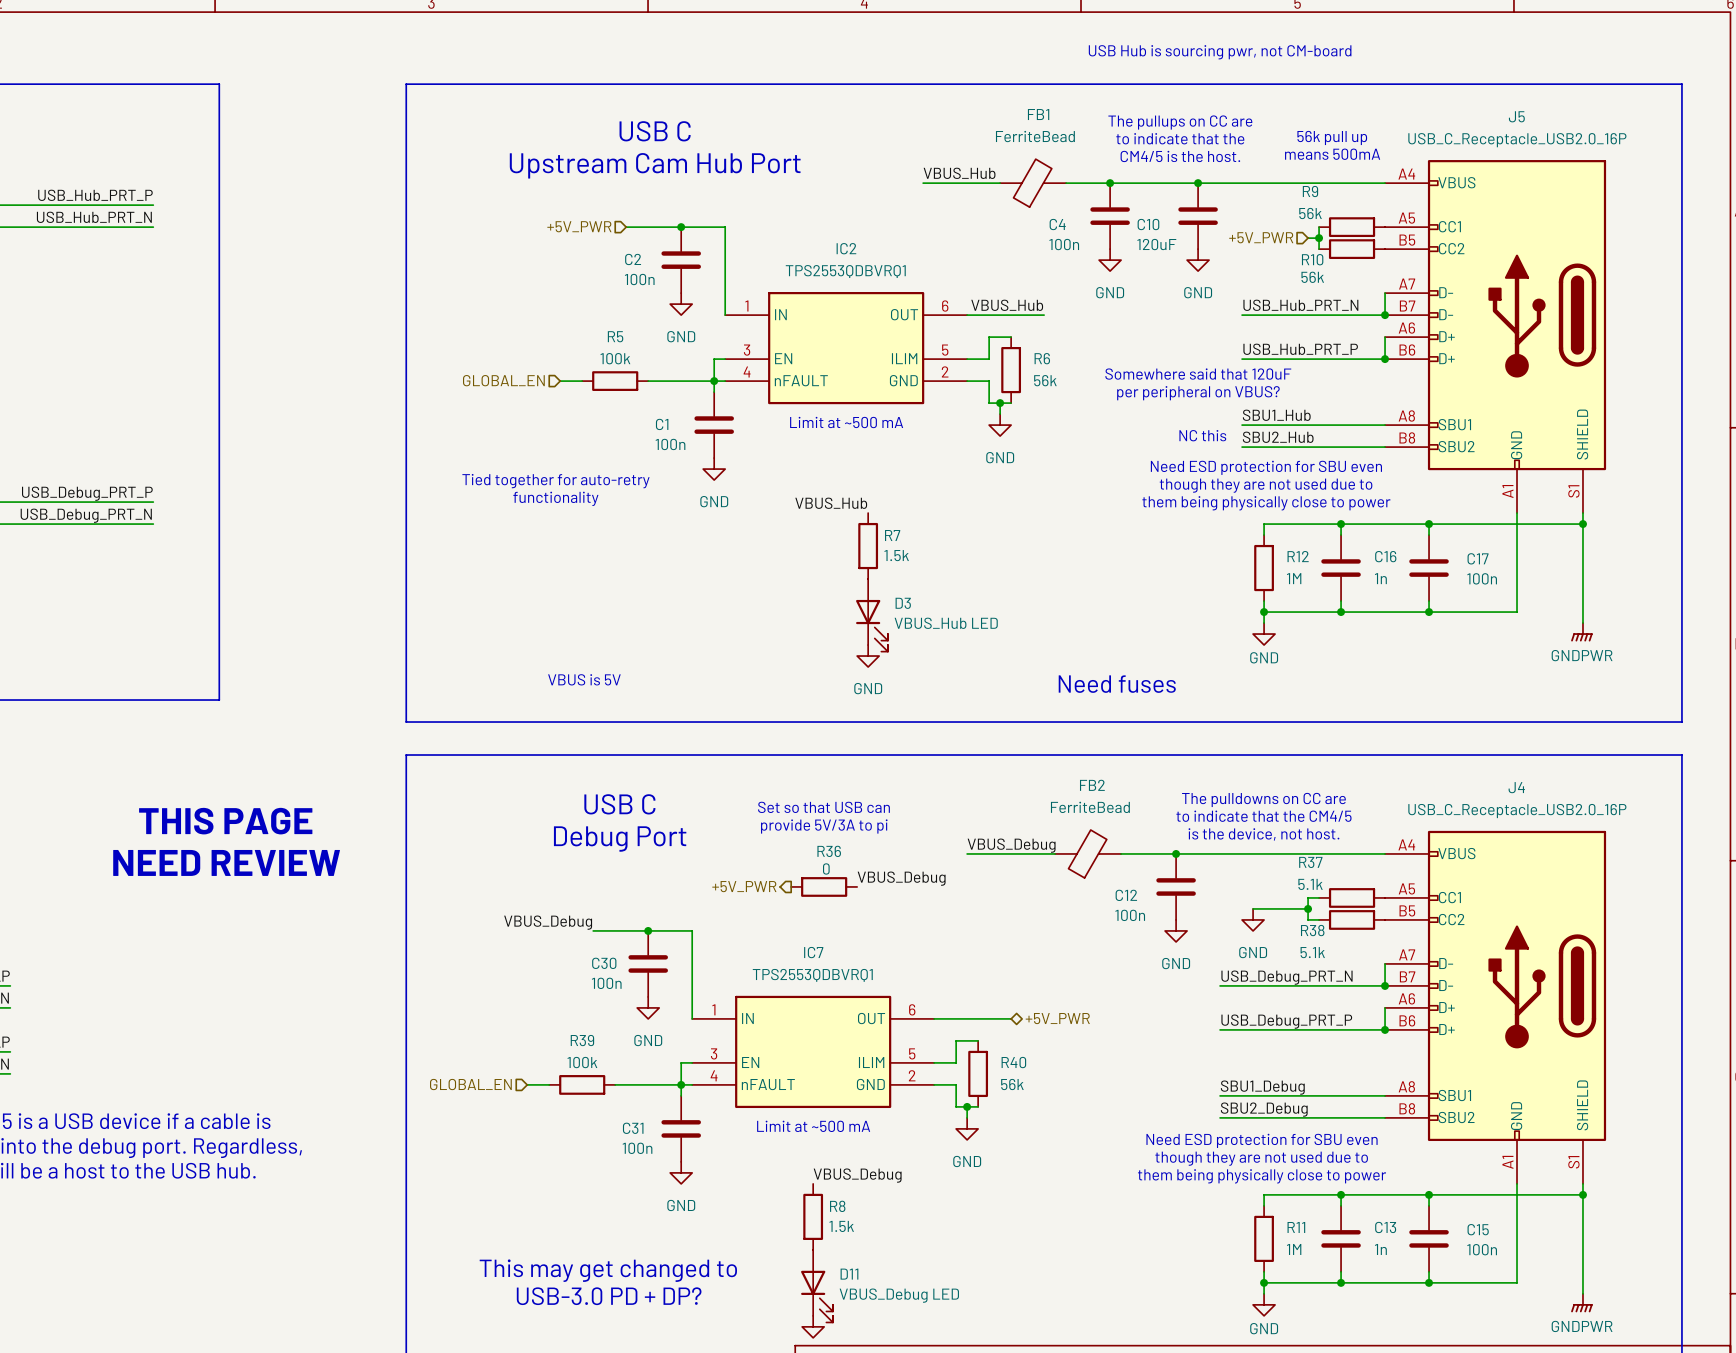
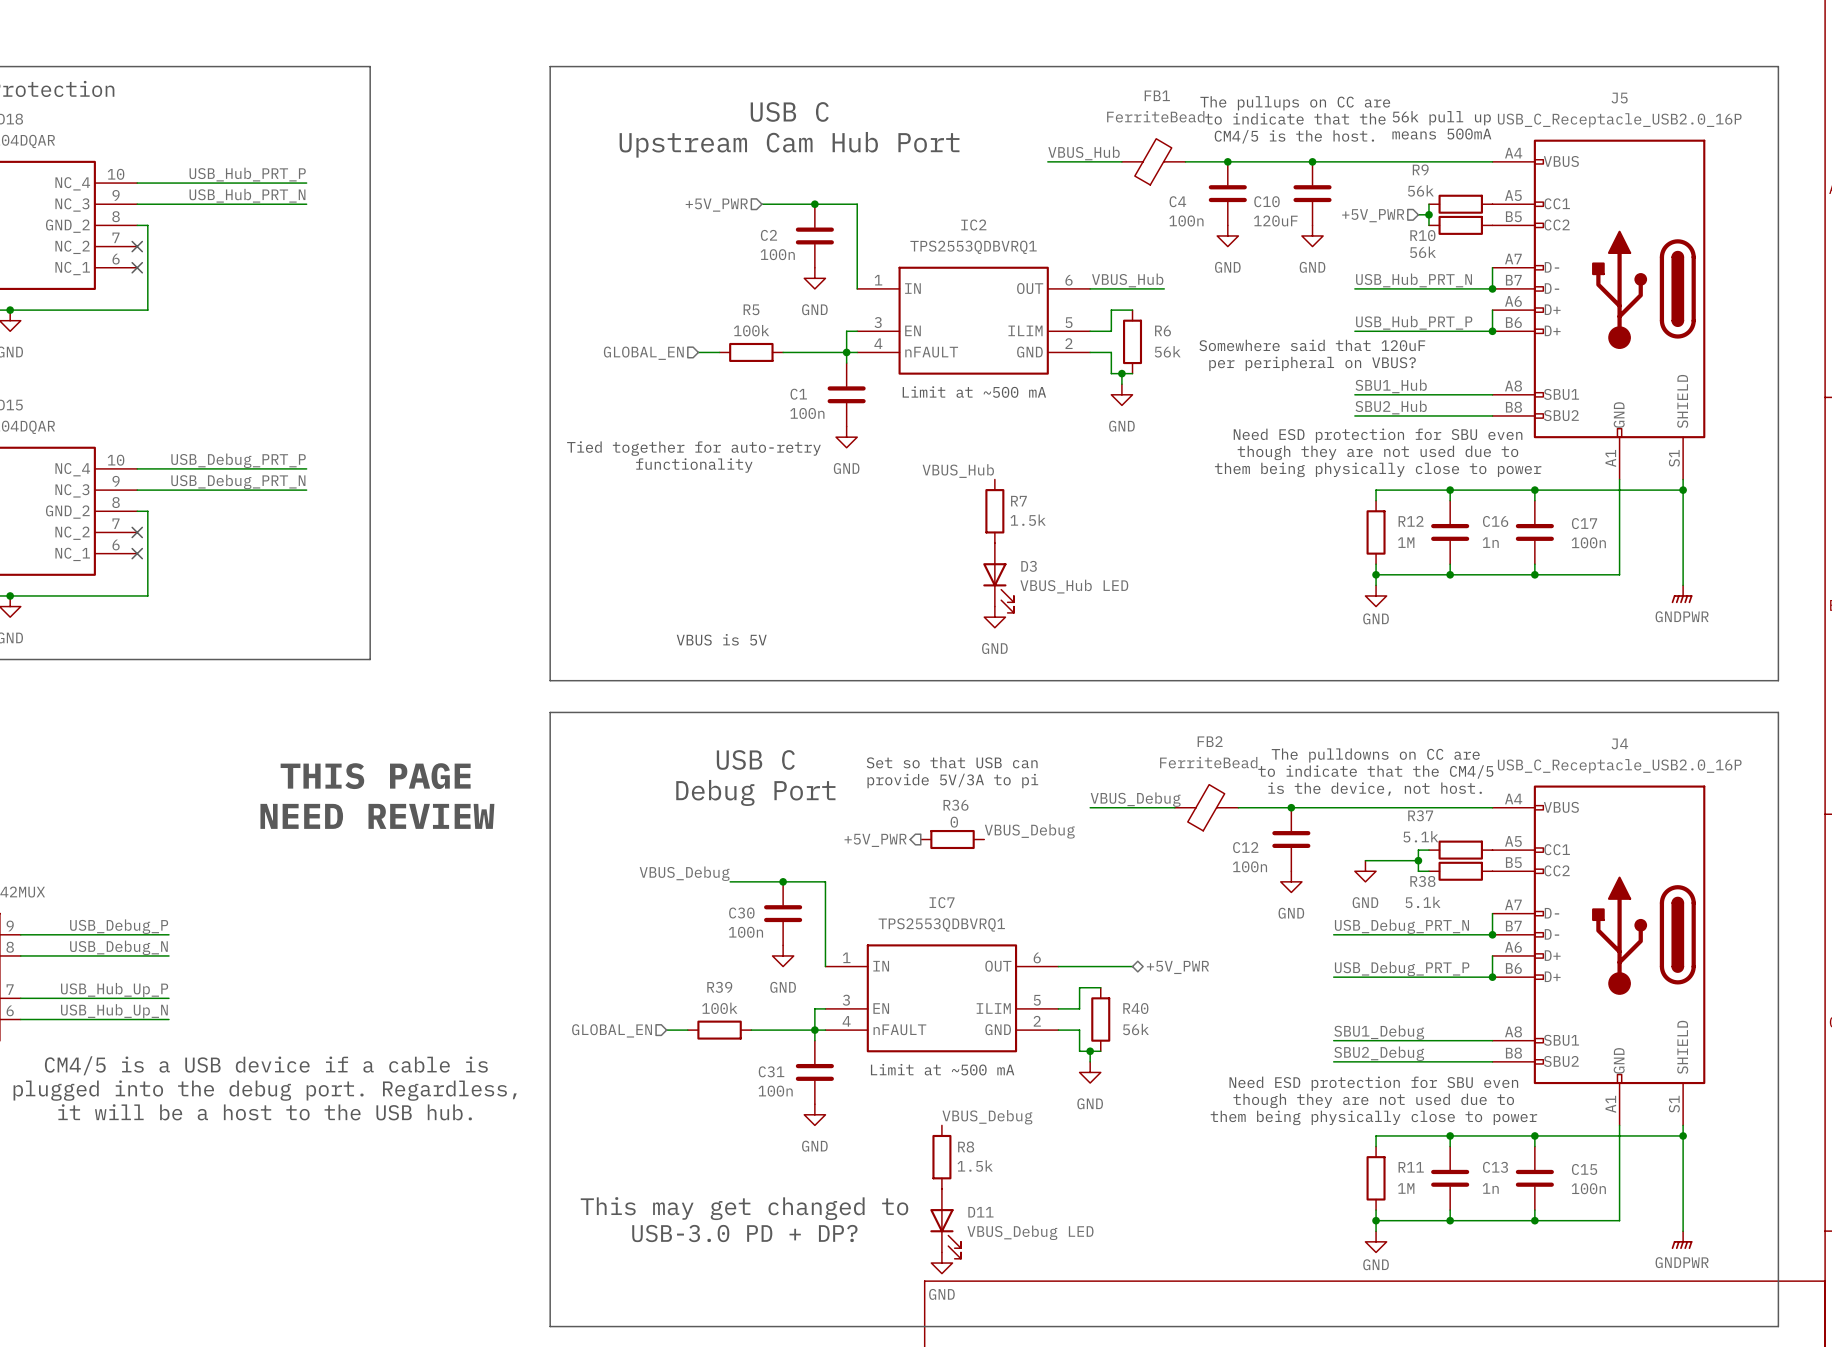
text: USB Hub is sourcing pwr, not CM-board (1220, 52) -> none
text: NC this (1202, 435) -> none
text: Need fuses (1117, 684) -> none

